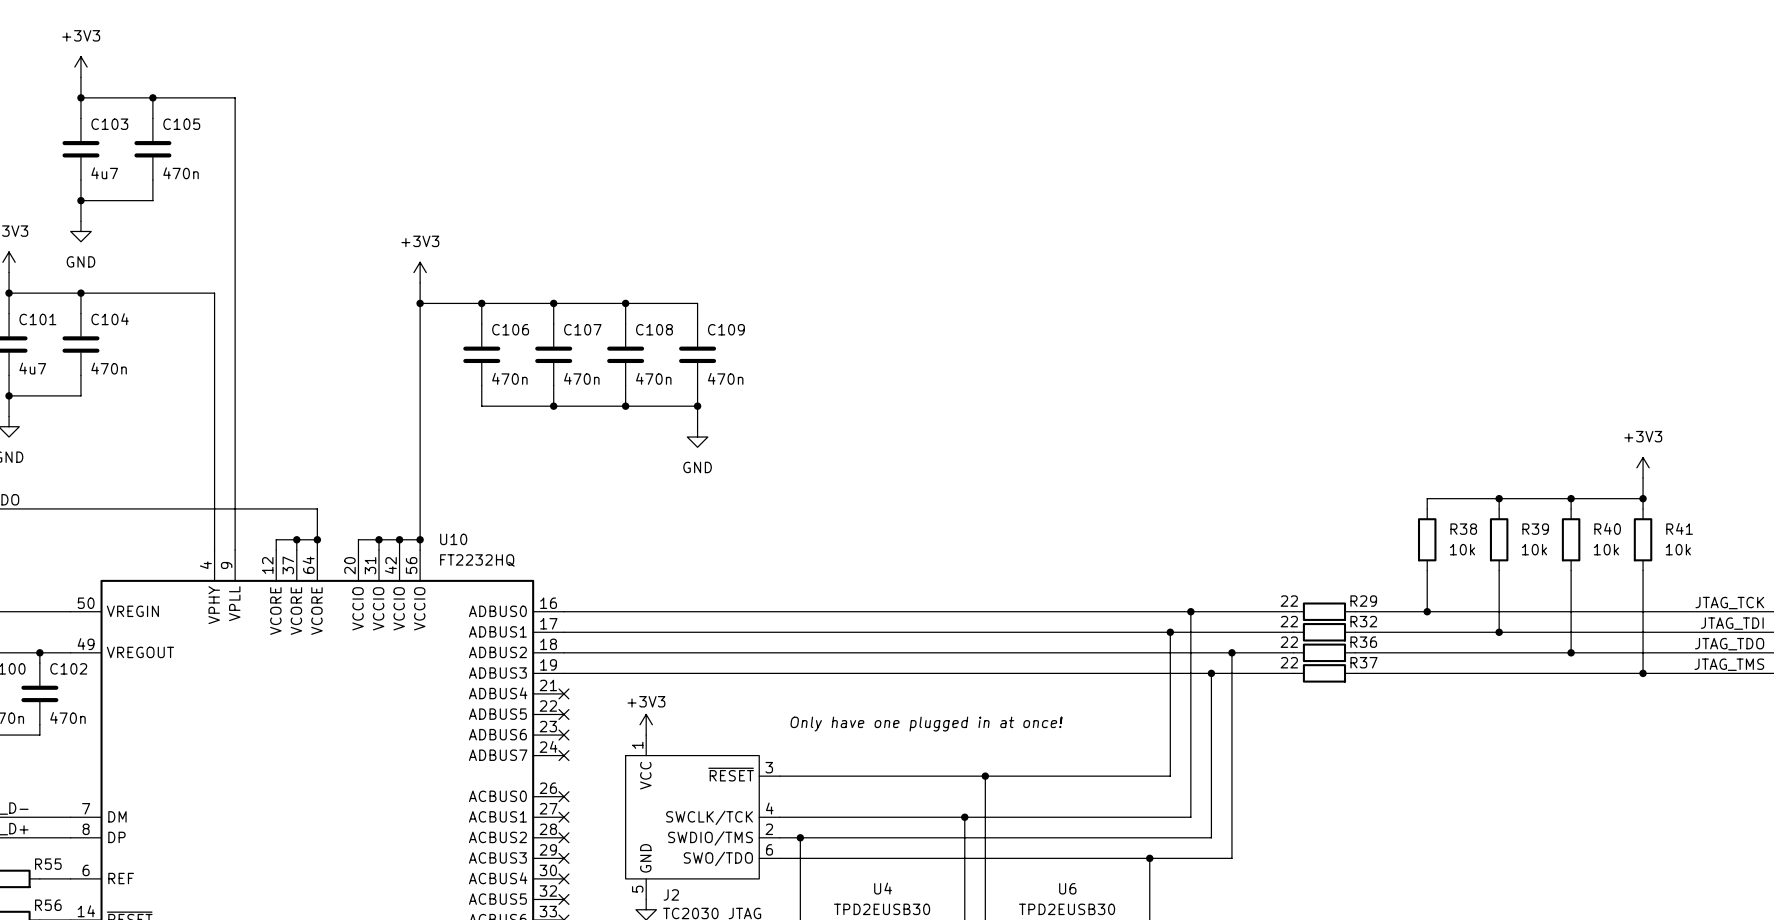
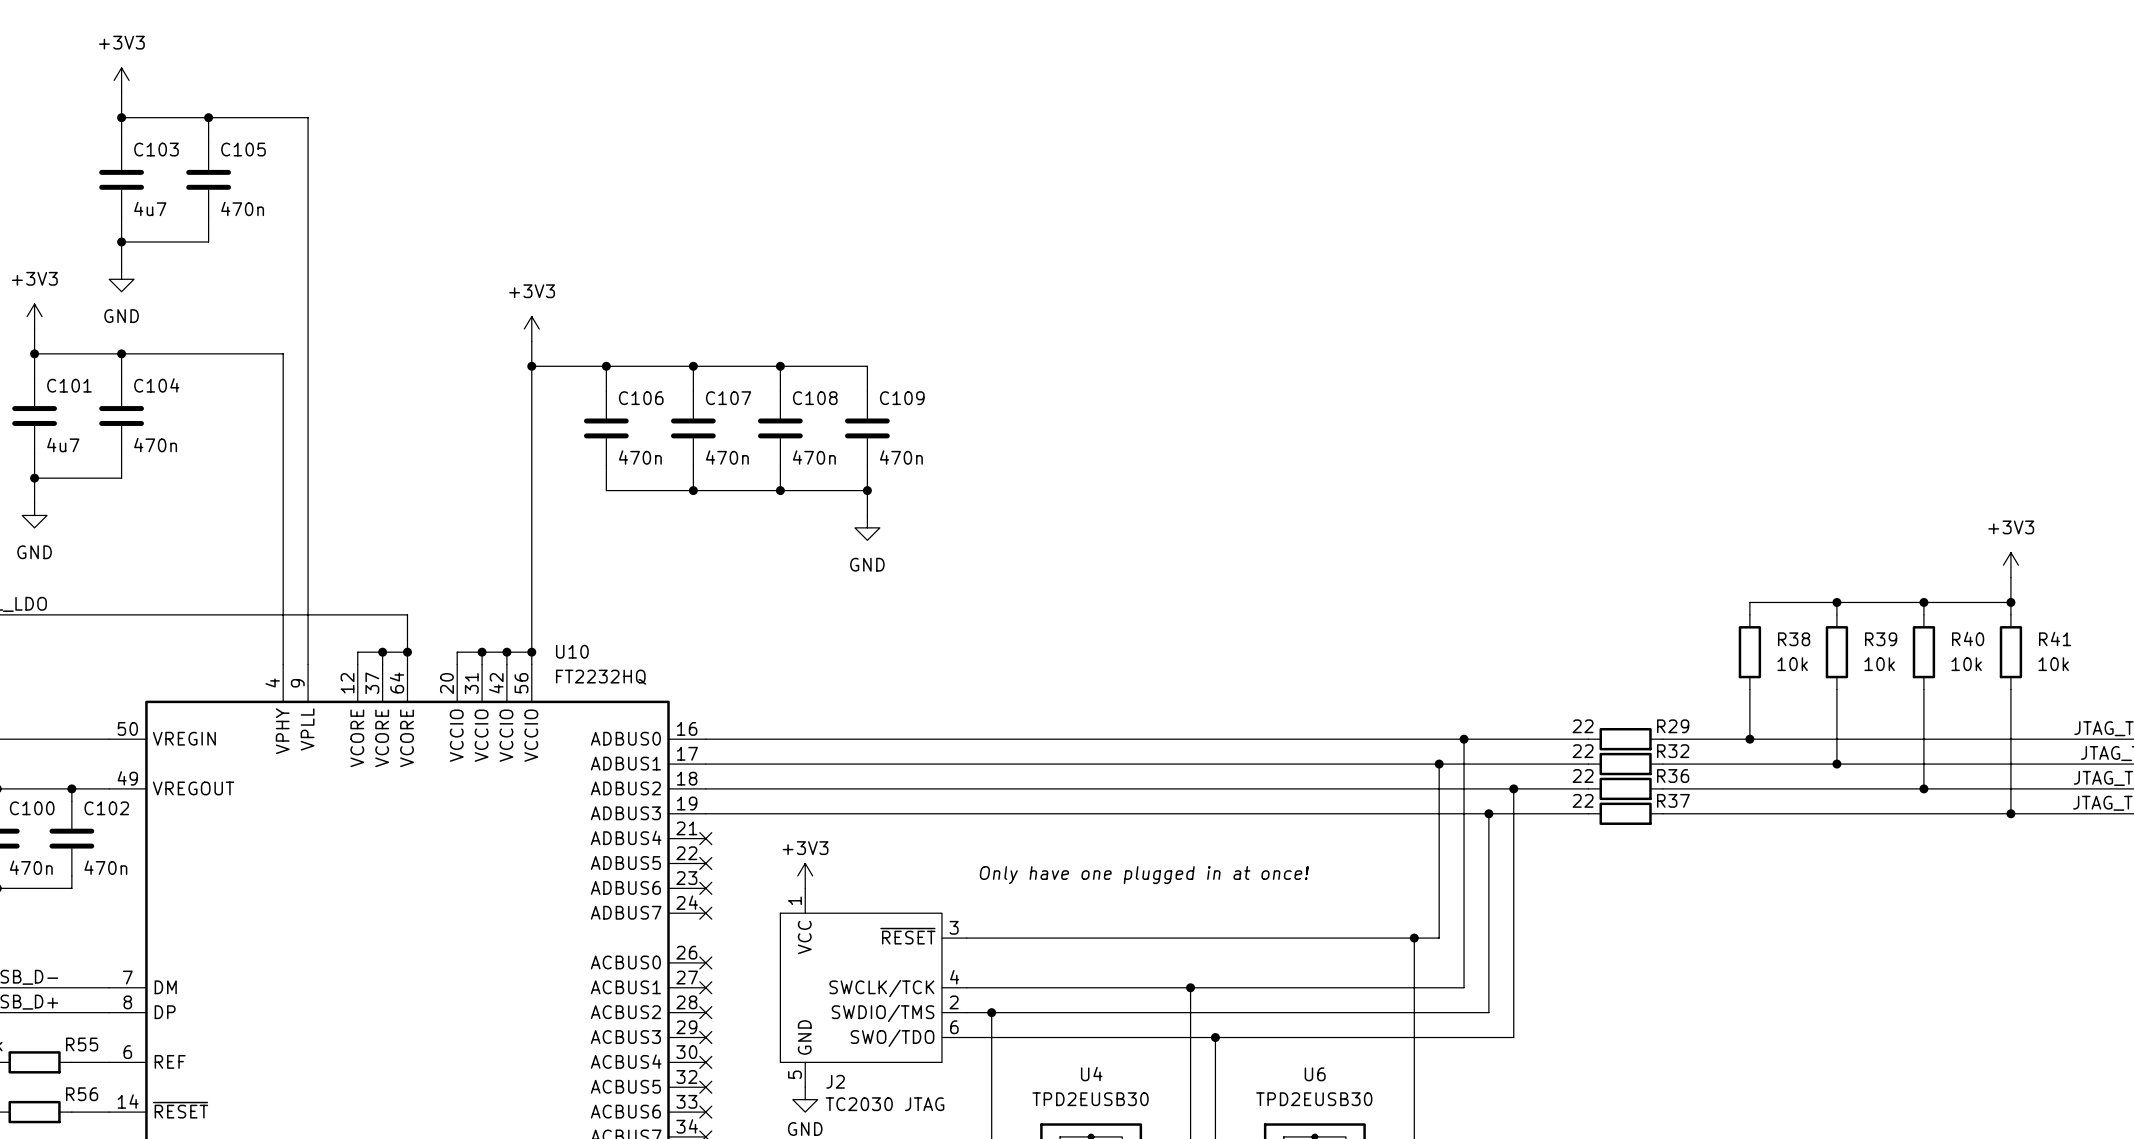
wire: (985, 776) (985, 858) -> (1414, 938) (1414, 1037)
junction: (985, 776) -> none
junction: none -> (1414, 938)
junction: none -> (1215, 1037)
junction: (1149, 858) -> none

